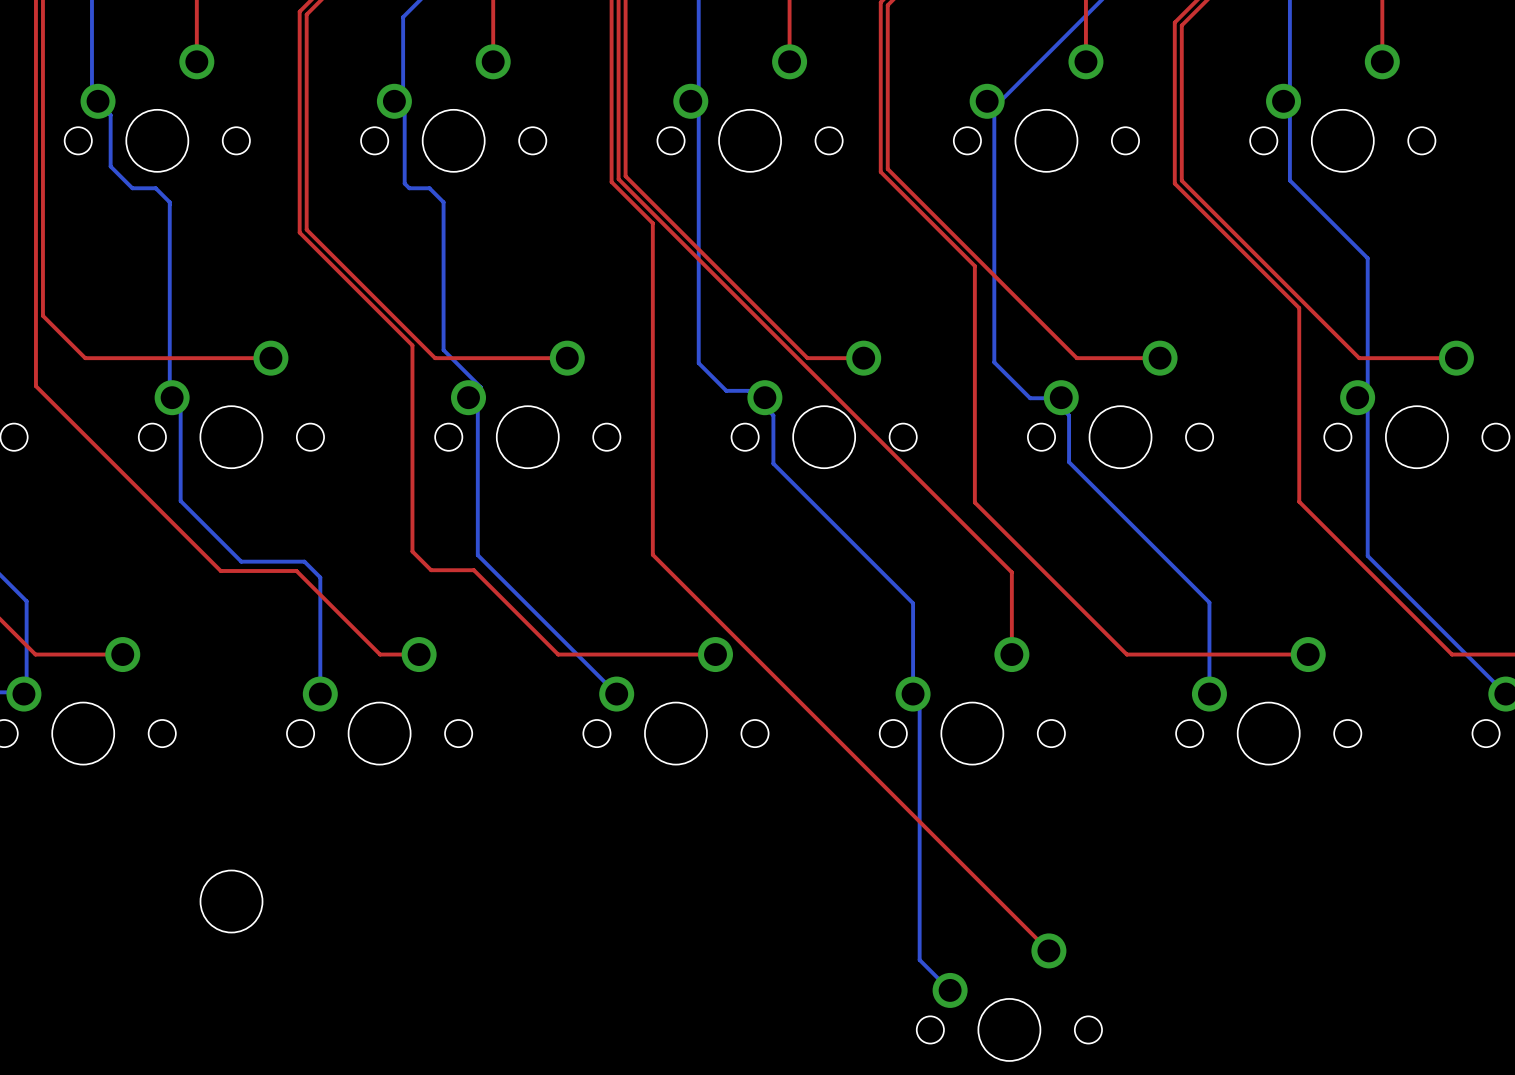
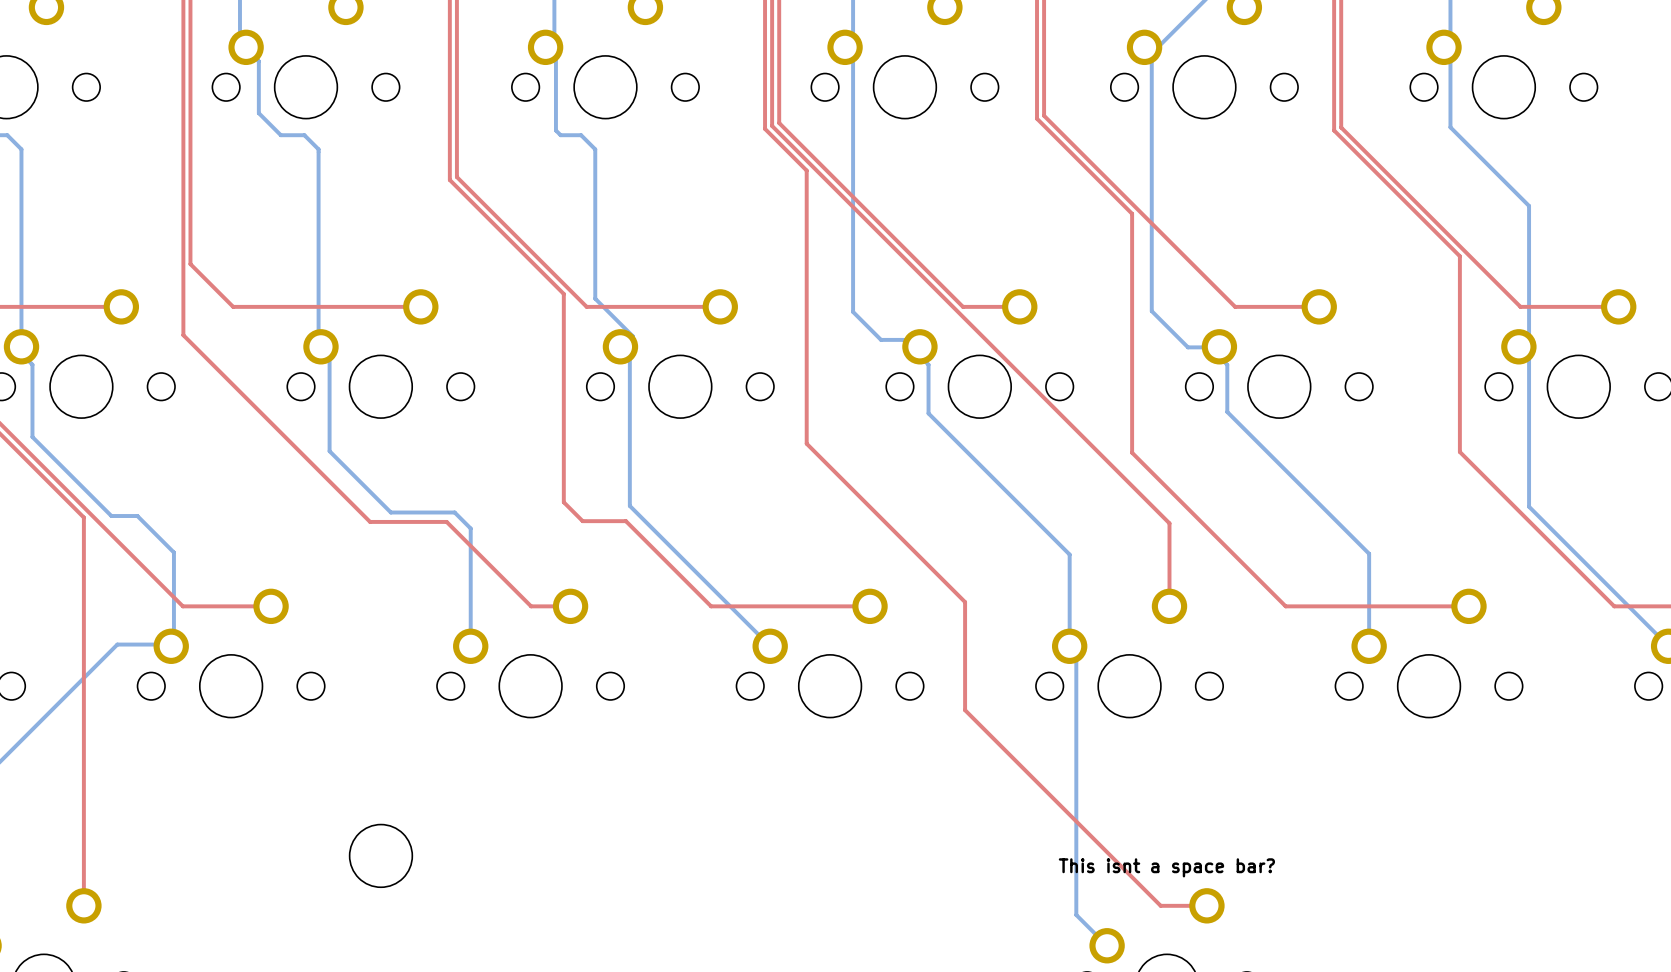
top track: (652, 493) (652, 554) (1048, 950) -> (806, 443) (965, 602) (965, 710) (1160, 905) (1206, 905)
text: none -> This isnt a space bar? (1166, 867)

